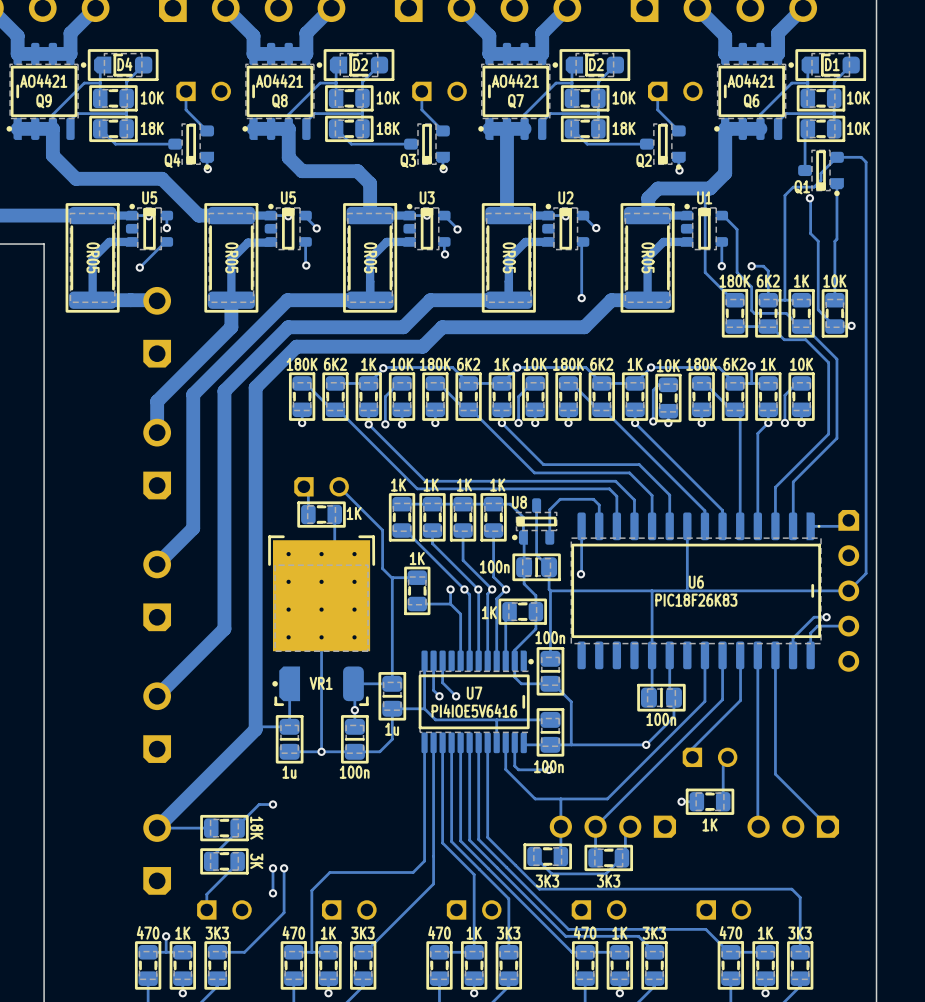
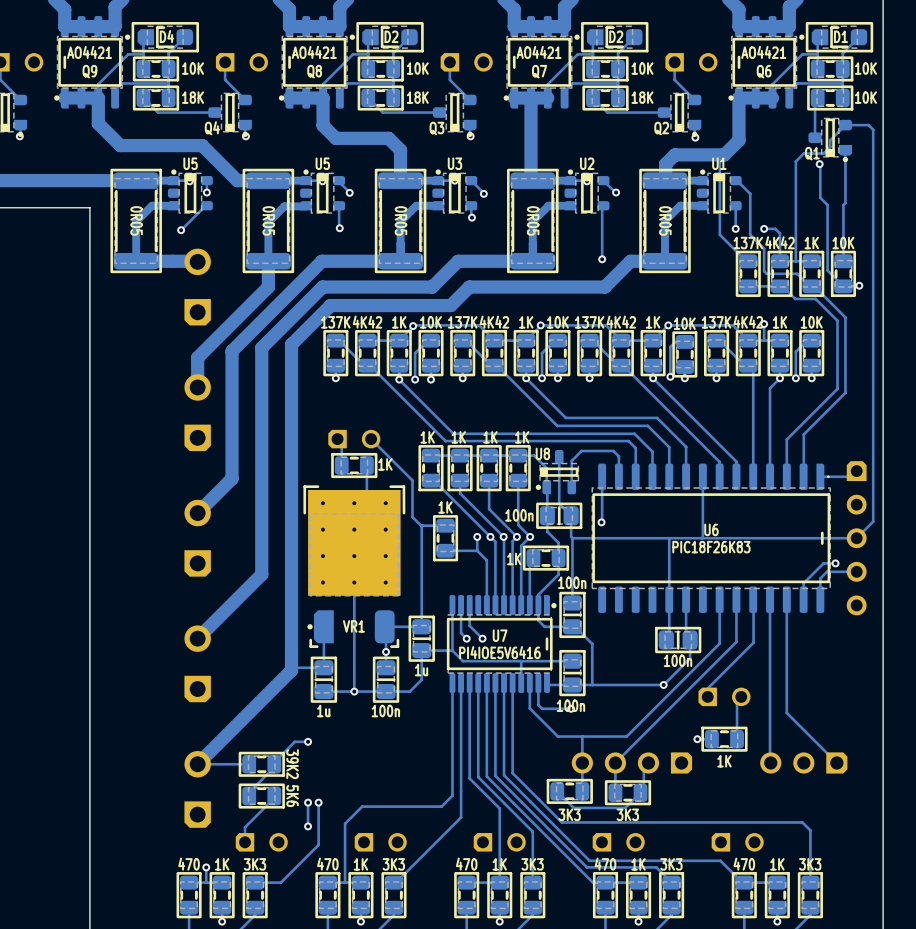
part value: 180K (735, 281) -> 137K (748, 243)
part value: 6K2 (768, 281) -> 4K42 (780, 242)
part value: 180K (302, 364) -> 137K (335, 322)
part value: 6K2 (335, 364) -> 4K42 (367, 322)
part value: 180K (435, 364) -> 137K (462, 322)
part value: 6K2 (468, 364) -> 4K42 (494, 322)
part value: 180K (568, 364) -> 137K (589, 322)
part value: 6K2 (601, 364) -> 4K42 (621, 322)
part value: 180K (701, 364) -> 137K (716, 322)
part value: 6K2 (735, 364) -> 4K42 (748, 322)
part value: 18K (256, 828) -> 39K2 (292, 764)
part value: 3K (256, 861) -> 5K6 (292, 796)

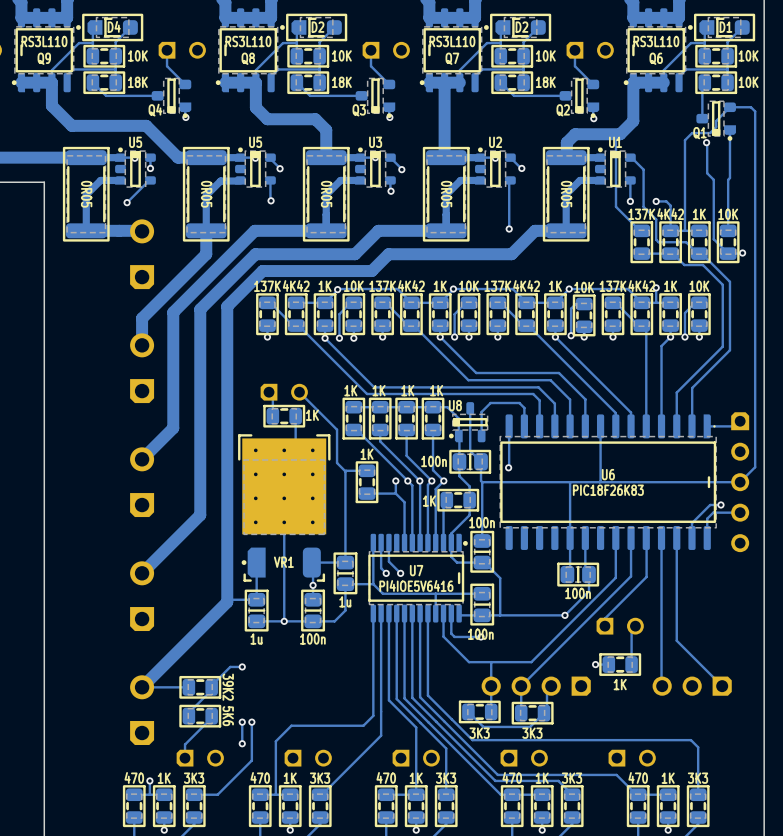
Q9 value: AO4421 (89, 52) -> RS3L110 (44, 41)
Q8 value: AO4421 (314, 52) -> RS3L110 (248, 41)
Q7 value: AO4421 (539, 52) -> RS3L110 (452, 41)
Q6 value: AO4421 (763, 52) -> RS3L110 (656, 41)

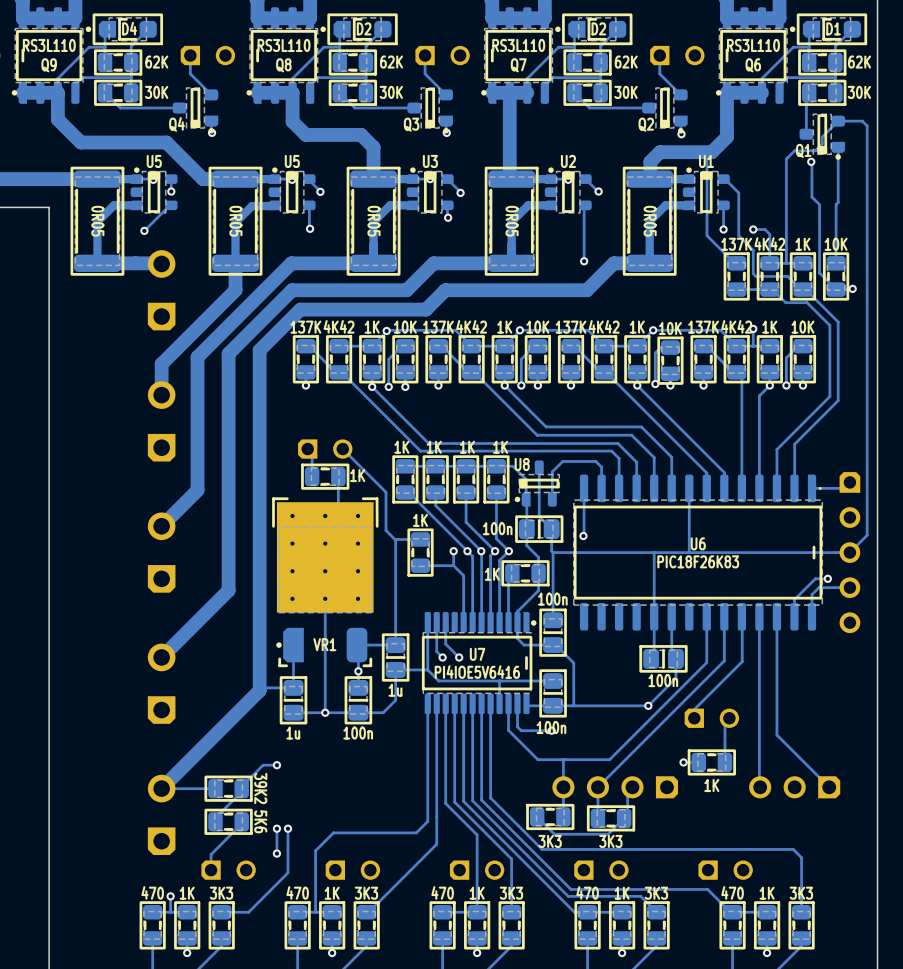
part value: 10K (137, 55) -> 62K (156, 62)
part value: 10K (341, 55) -> 62K (391, 62)
part value: 10K (545, 55) -> 62K (626, 62)
part value: 10K (748, 55) -> 62K (859, 62)
part value: 18K (137, 82) -> 30K (156, 92)
part value: 18K (341, 82) -> 30K (391, 92)
part value: 18K (545, 82) -> 30K (626, 92)
part value: 10K (748, 82) -> 30K (859, 92)

